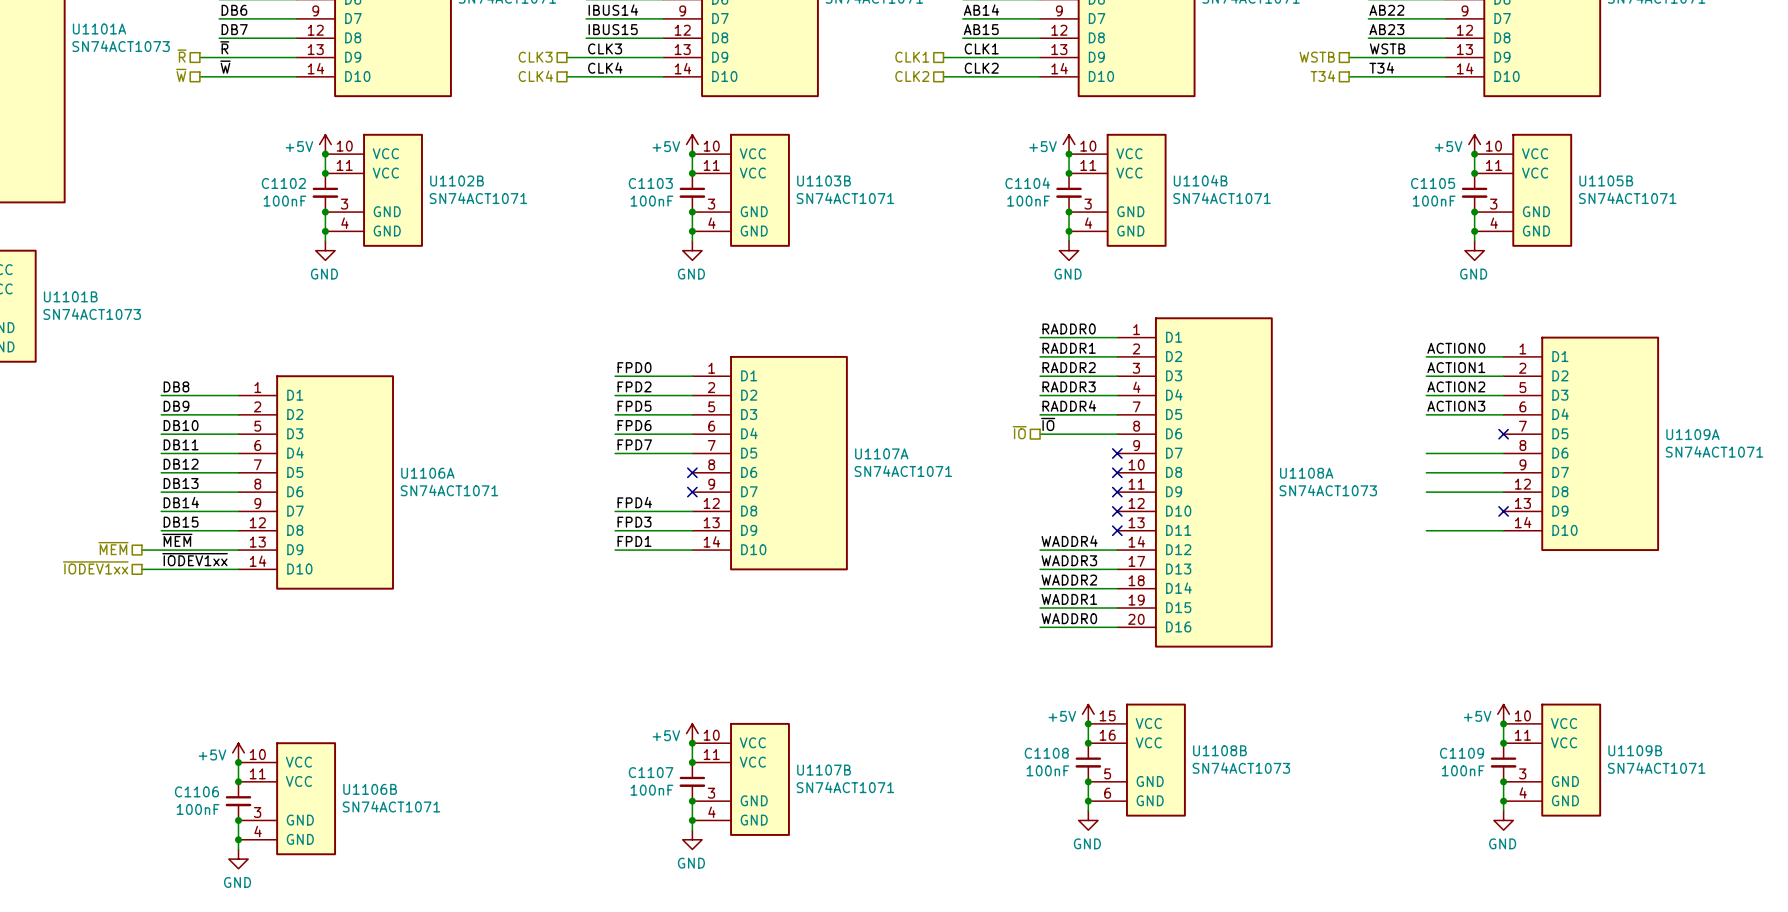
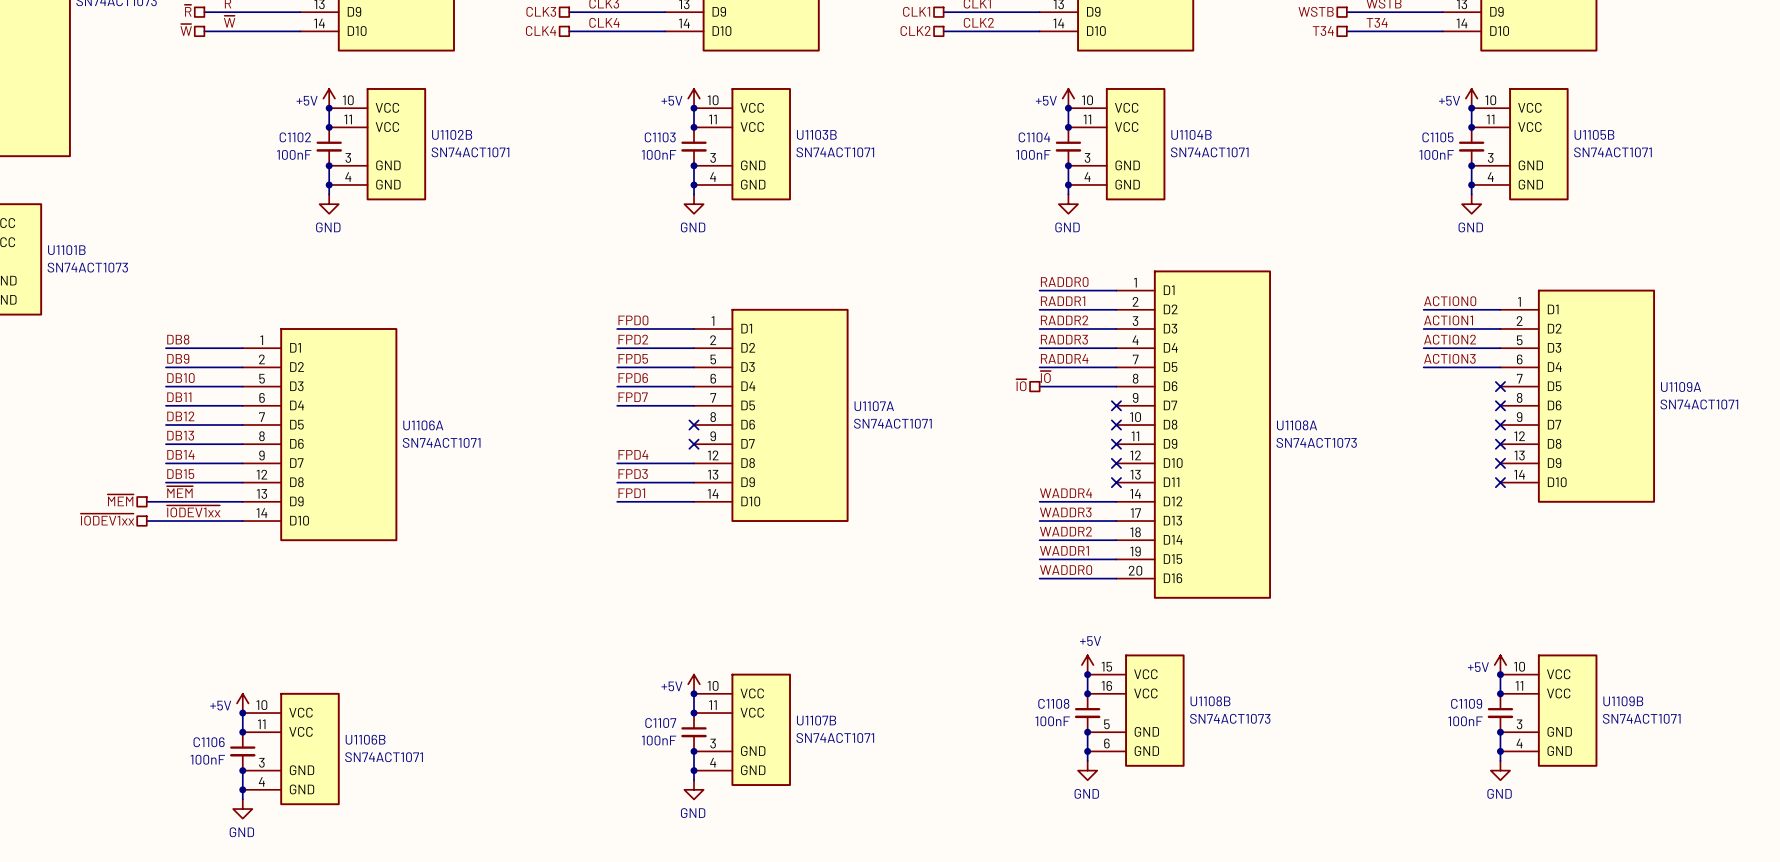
wire: (1426, 453) (1503, 453) -> none
no-connect mark: none -> (1500, 405)
wire: (1426, 472) (1503, 472) -> none
no-connect mark: none -> (1500, 425)
wire: (1426, 492) (1503, 492) -> none
no-connect mark: none -> (1500, 444)
wire: (1426, 530) (1503, 530) -> none
no-connect mark: none -> (1500, 482)
power symbol text position: +5V (1062, 716) -> +5V (1090, 641)

